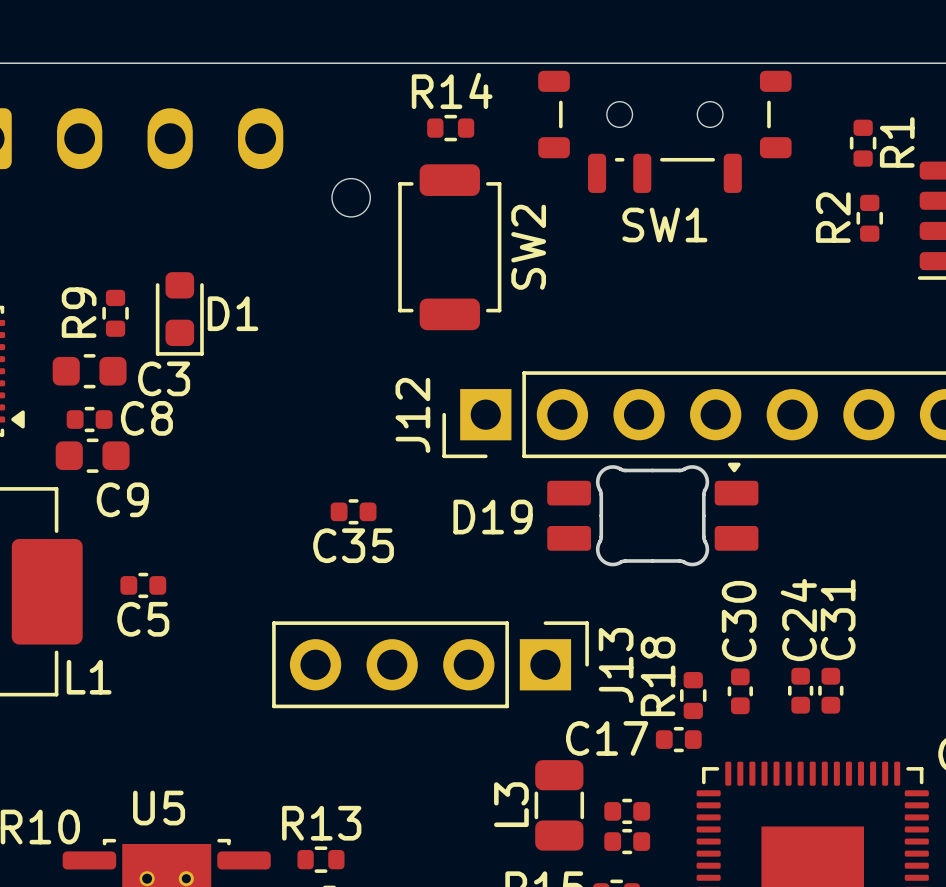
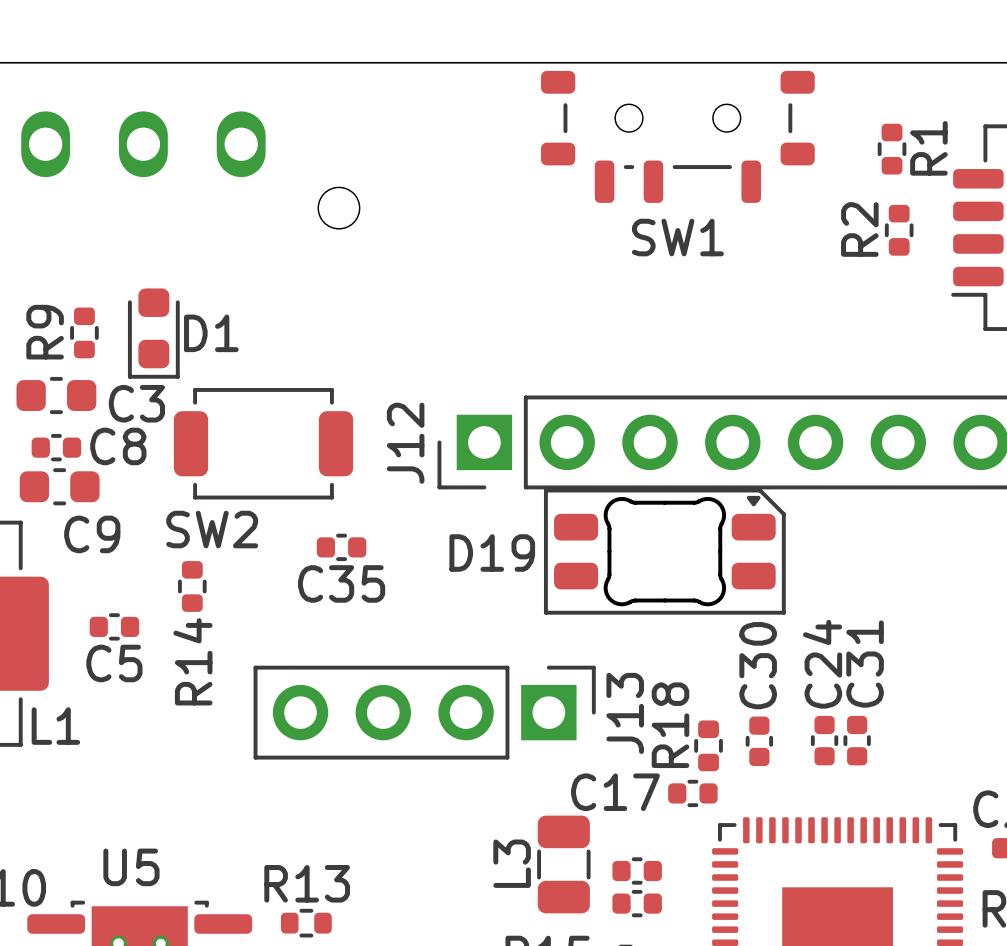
R14 name position: R14 (452, 90) -> R14 (192, 661)
R14 rotation: 0° (450, 128) -> 90° clockwise (192, 586)
R14 position: (450, 128) -> (192, 586)
SW2 rotation: 0° (449, 247) -> 90° clockwise (263, 443)
SW2 position: (449, 247) -> (263, 443)
D19 footprint: [547, 462, 759, 567] -> [543, 488, 786, 615]

